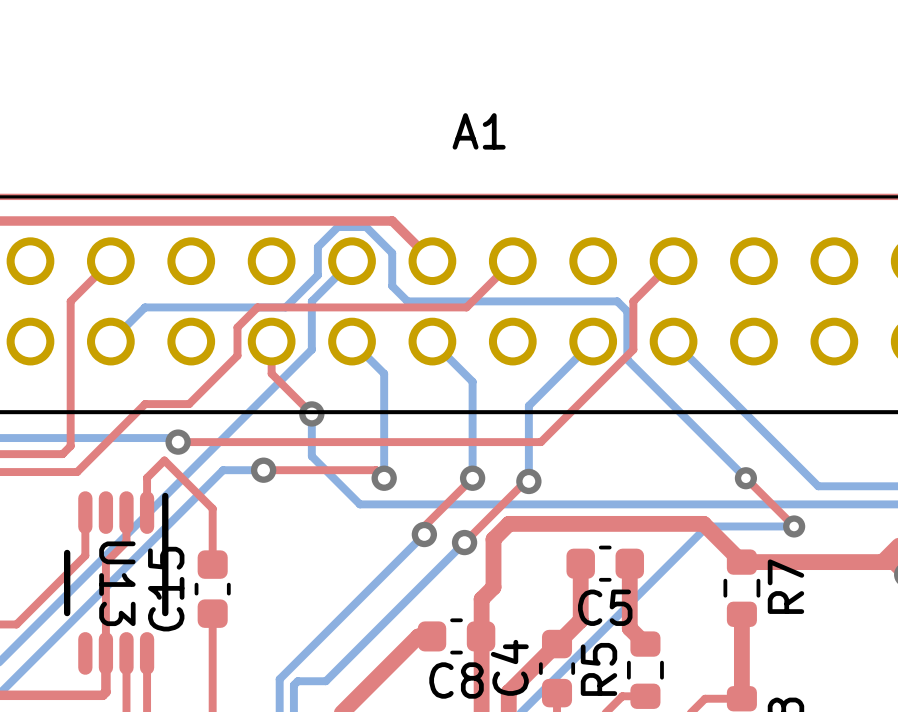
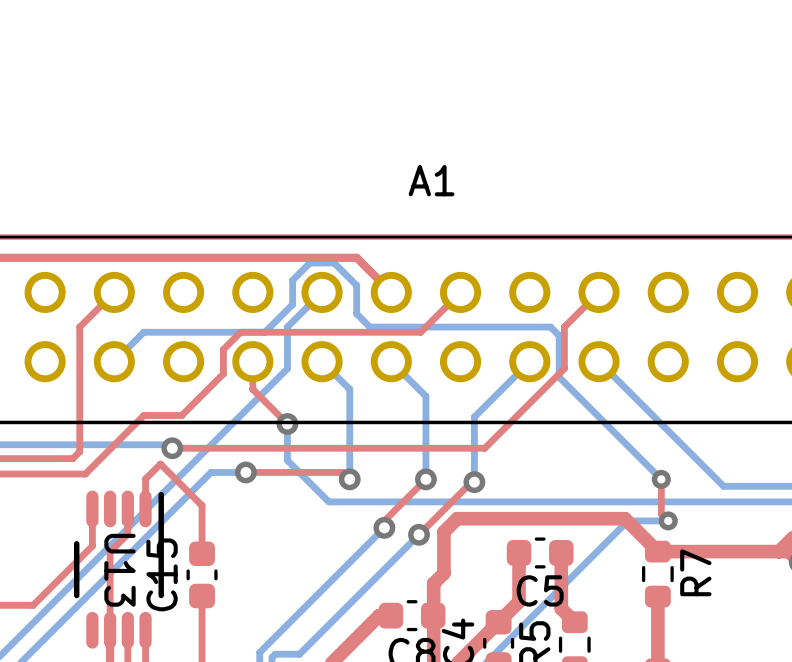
top track: (745, 478) (794, 526) -> (661, 479) (661, 514) (668, 520)
bottom track: (753, 526) (794, 526) -> none
via position: (794, 526) -> (668, 520)

